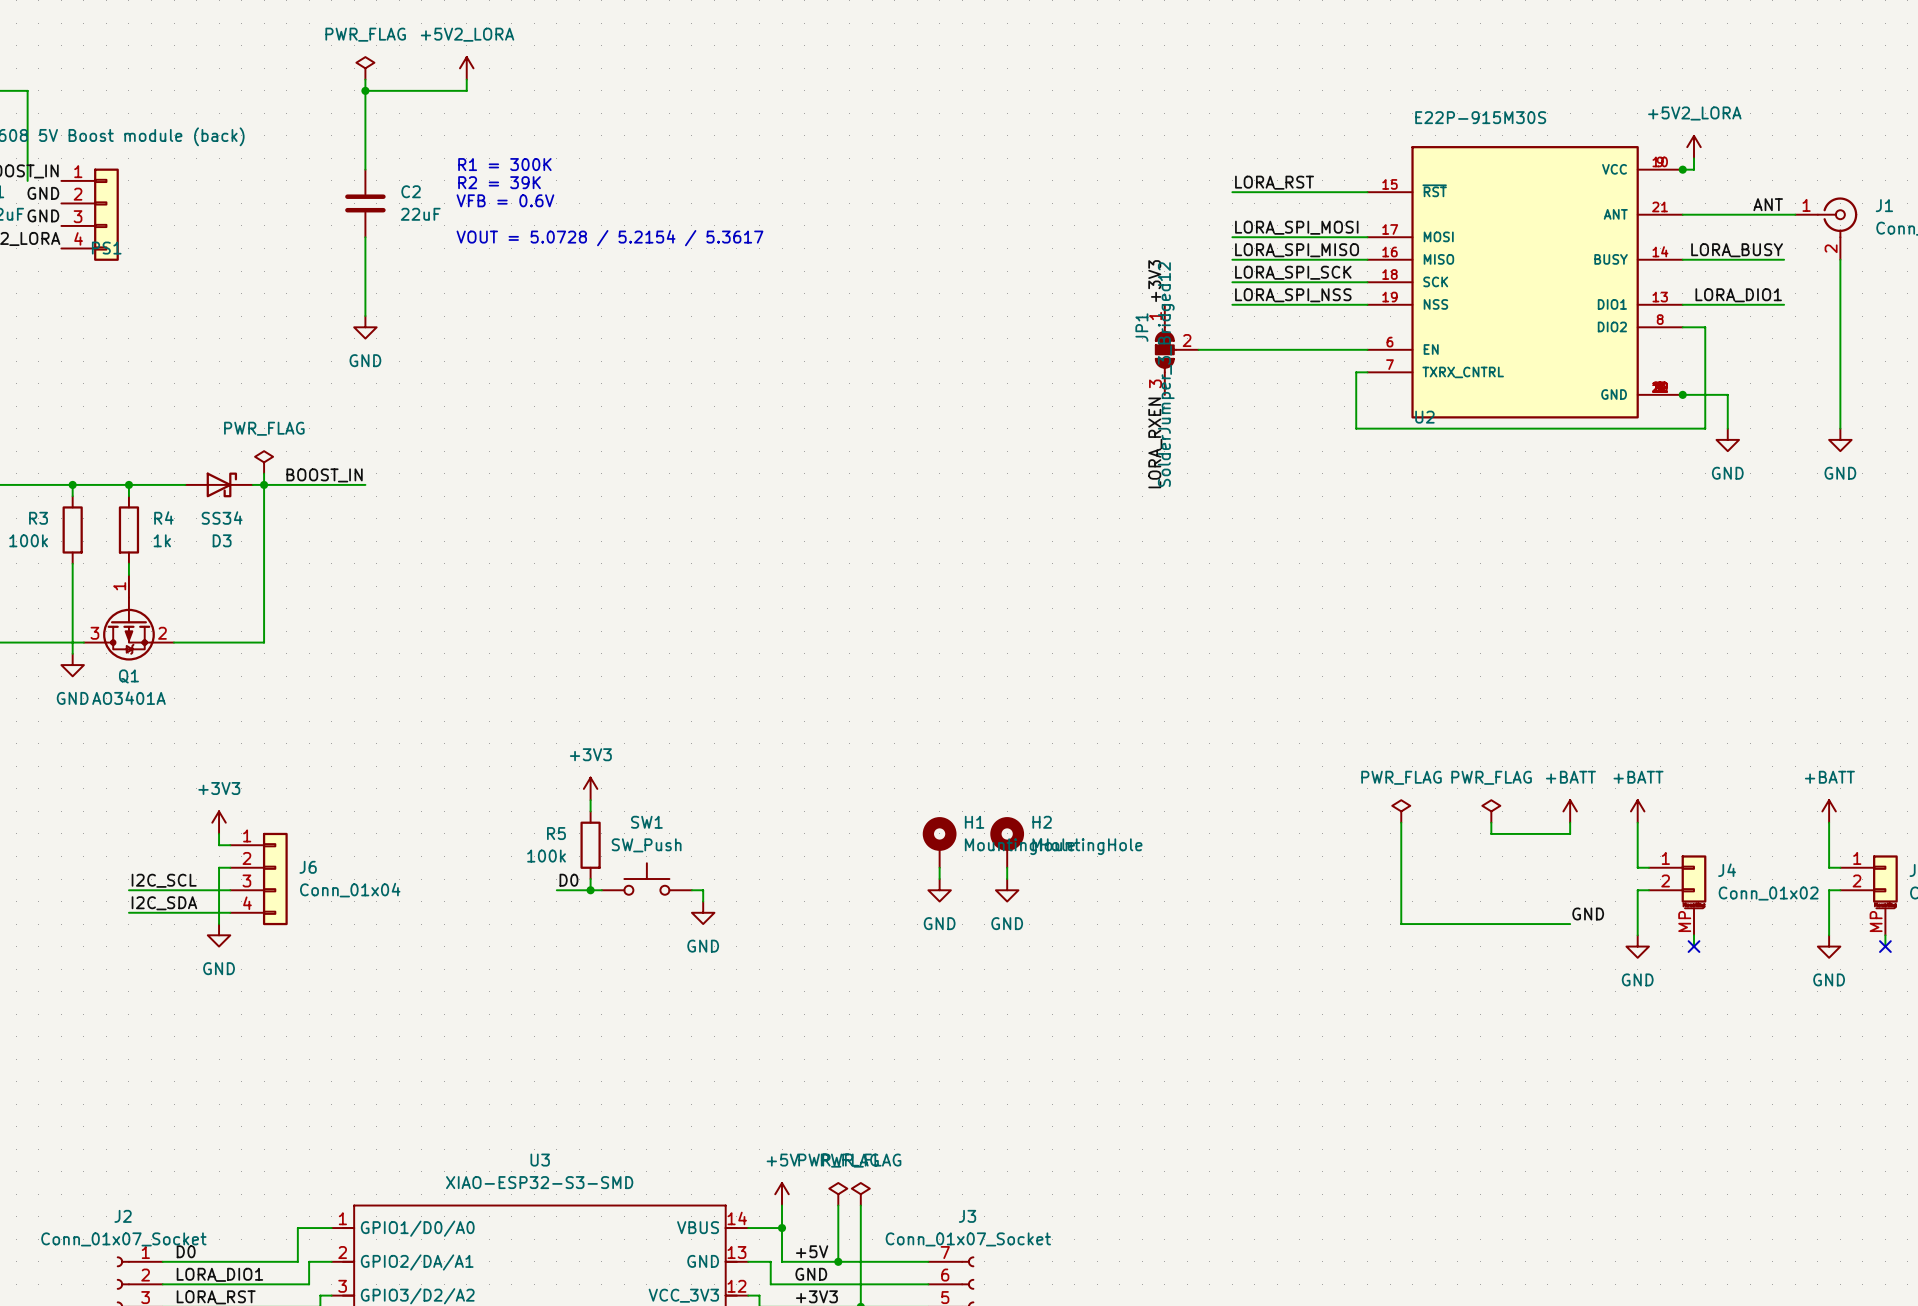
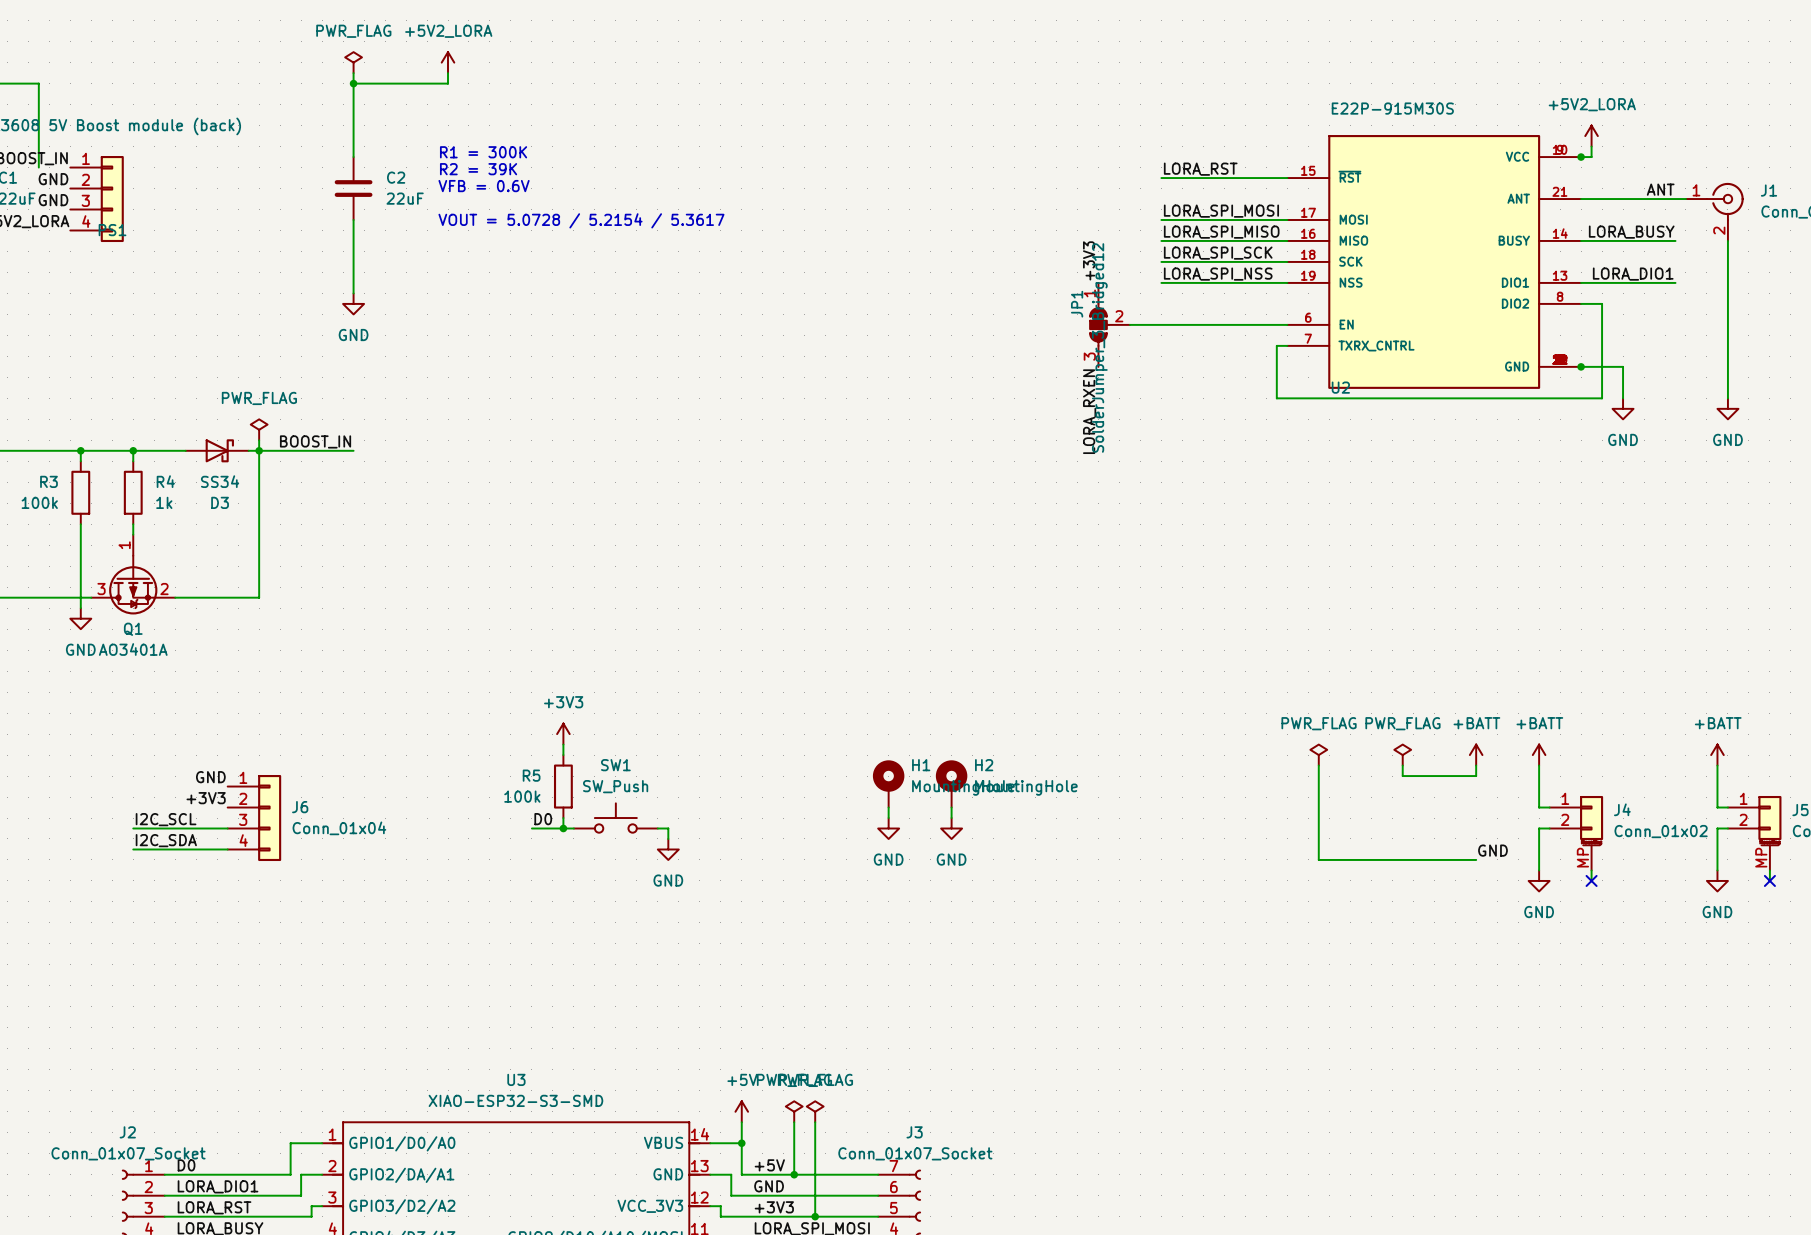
power symbol: +3V3 (219, 822) -> none
wire: (219, 833) (219, 845) (230, 845) -> none
label: none -> GND (210, 777)
label: none -> +3V3 (206, 798)
wire: (230, 867) (219, 867) (219, 924) -> none
power symbol: GND (219, 935) -> none

